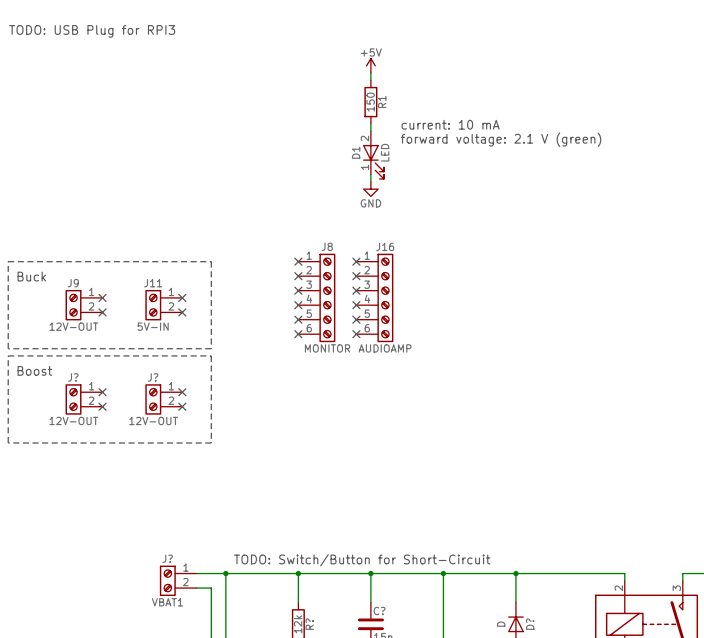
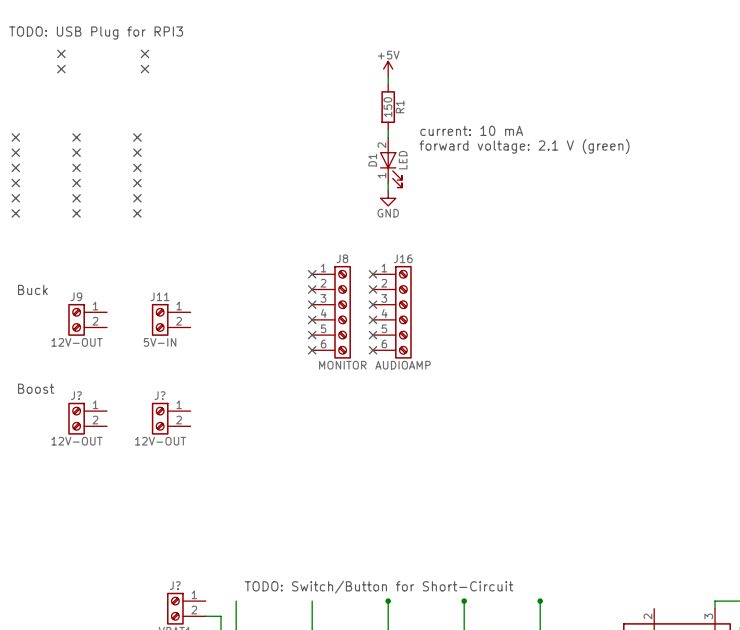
no-connect mark: none -> (61, 53)
no-connect mark: none -> (144, 53)
no-connect mark: none -> (61, 69)
no-connect mark: none -> (144, 69)
no-connect mark: none -> (15, 137)
no-connect mark: none -> (76, 137)
no-connect mark: none -> (137, 137)
no-connect mark: none -> (15, 152)
no-connect mark: none -> (76, 152)
no-connect mark: none -> (137, 152)
no-connect mark: none -> (15, 167)
no-connect mark: none -> (76, 167)
no-connect mark: none -> (137, 167)
no-connect mark: none -> (15, 183)
no-connect mark: none -> (76, 183)
no-connect mark: none -> (137, 183)
no-connect mark: none -> (15, 198)
no-connect mark: none -> (76, 198)
no-connect mark: none -> (137, 198)
no-connect mark: none -> (15, 213)
no-connect mark: none -> (76, 213)
no-connect mark: none -> (137, 213)
line: (8, 261) (211, 261) (211, 348) (8, 348) (8, 261) -> none
no-connect mark: (102, 297) -> none
no-connect mark: (182, 297) -> none
no-connect mark: (102, 312) -> none
no-connect mark: (182, 312) -> none
line: (8, 355) (8, 442) (211, 442) (211, 355) (8, 355) -> none
no-connect mark: (102, 392) -> none
no-connect mark: (182, 392) -> none
no-connect mark: (102, 406) -> none
no-connect mark: (182, 406) -> none
wire: (196, 573) (624, 573) (624, 580) -> none
junction: (225, 573) -> none
junction: (298, 573) -> none

